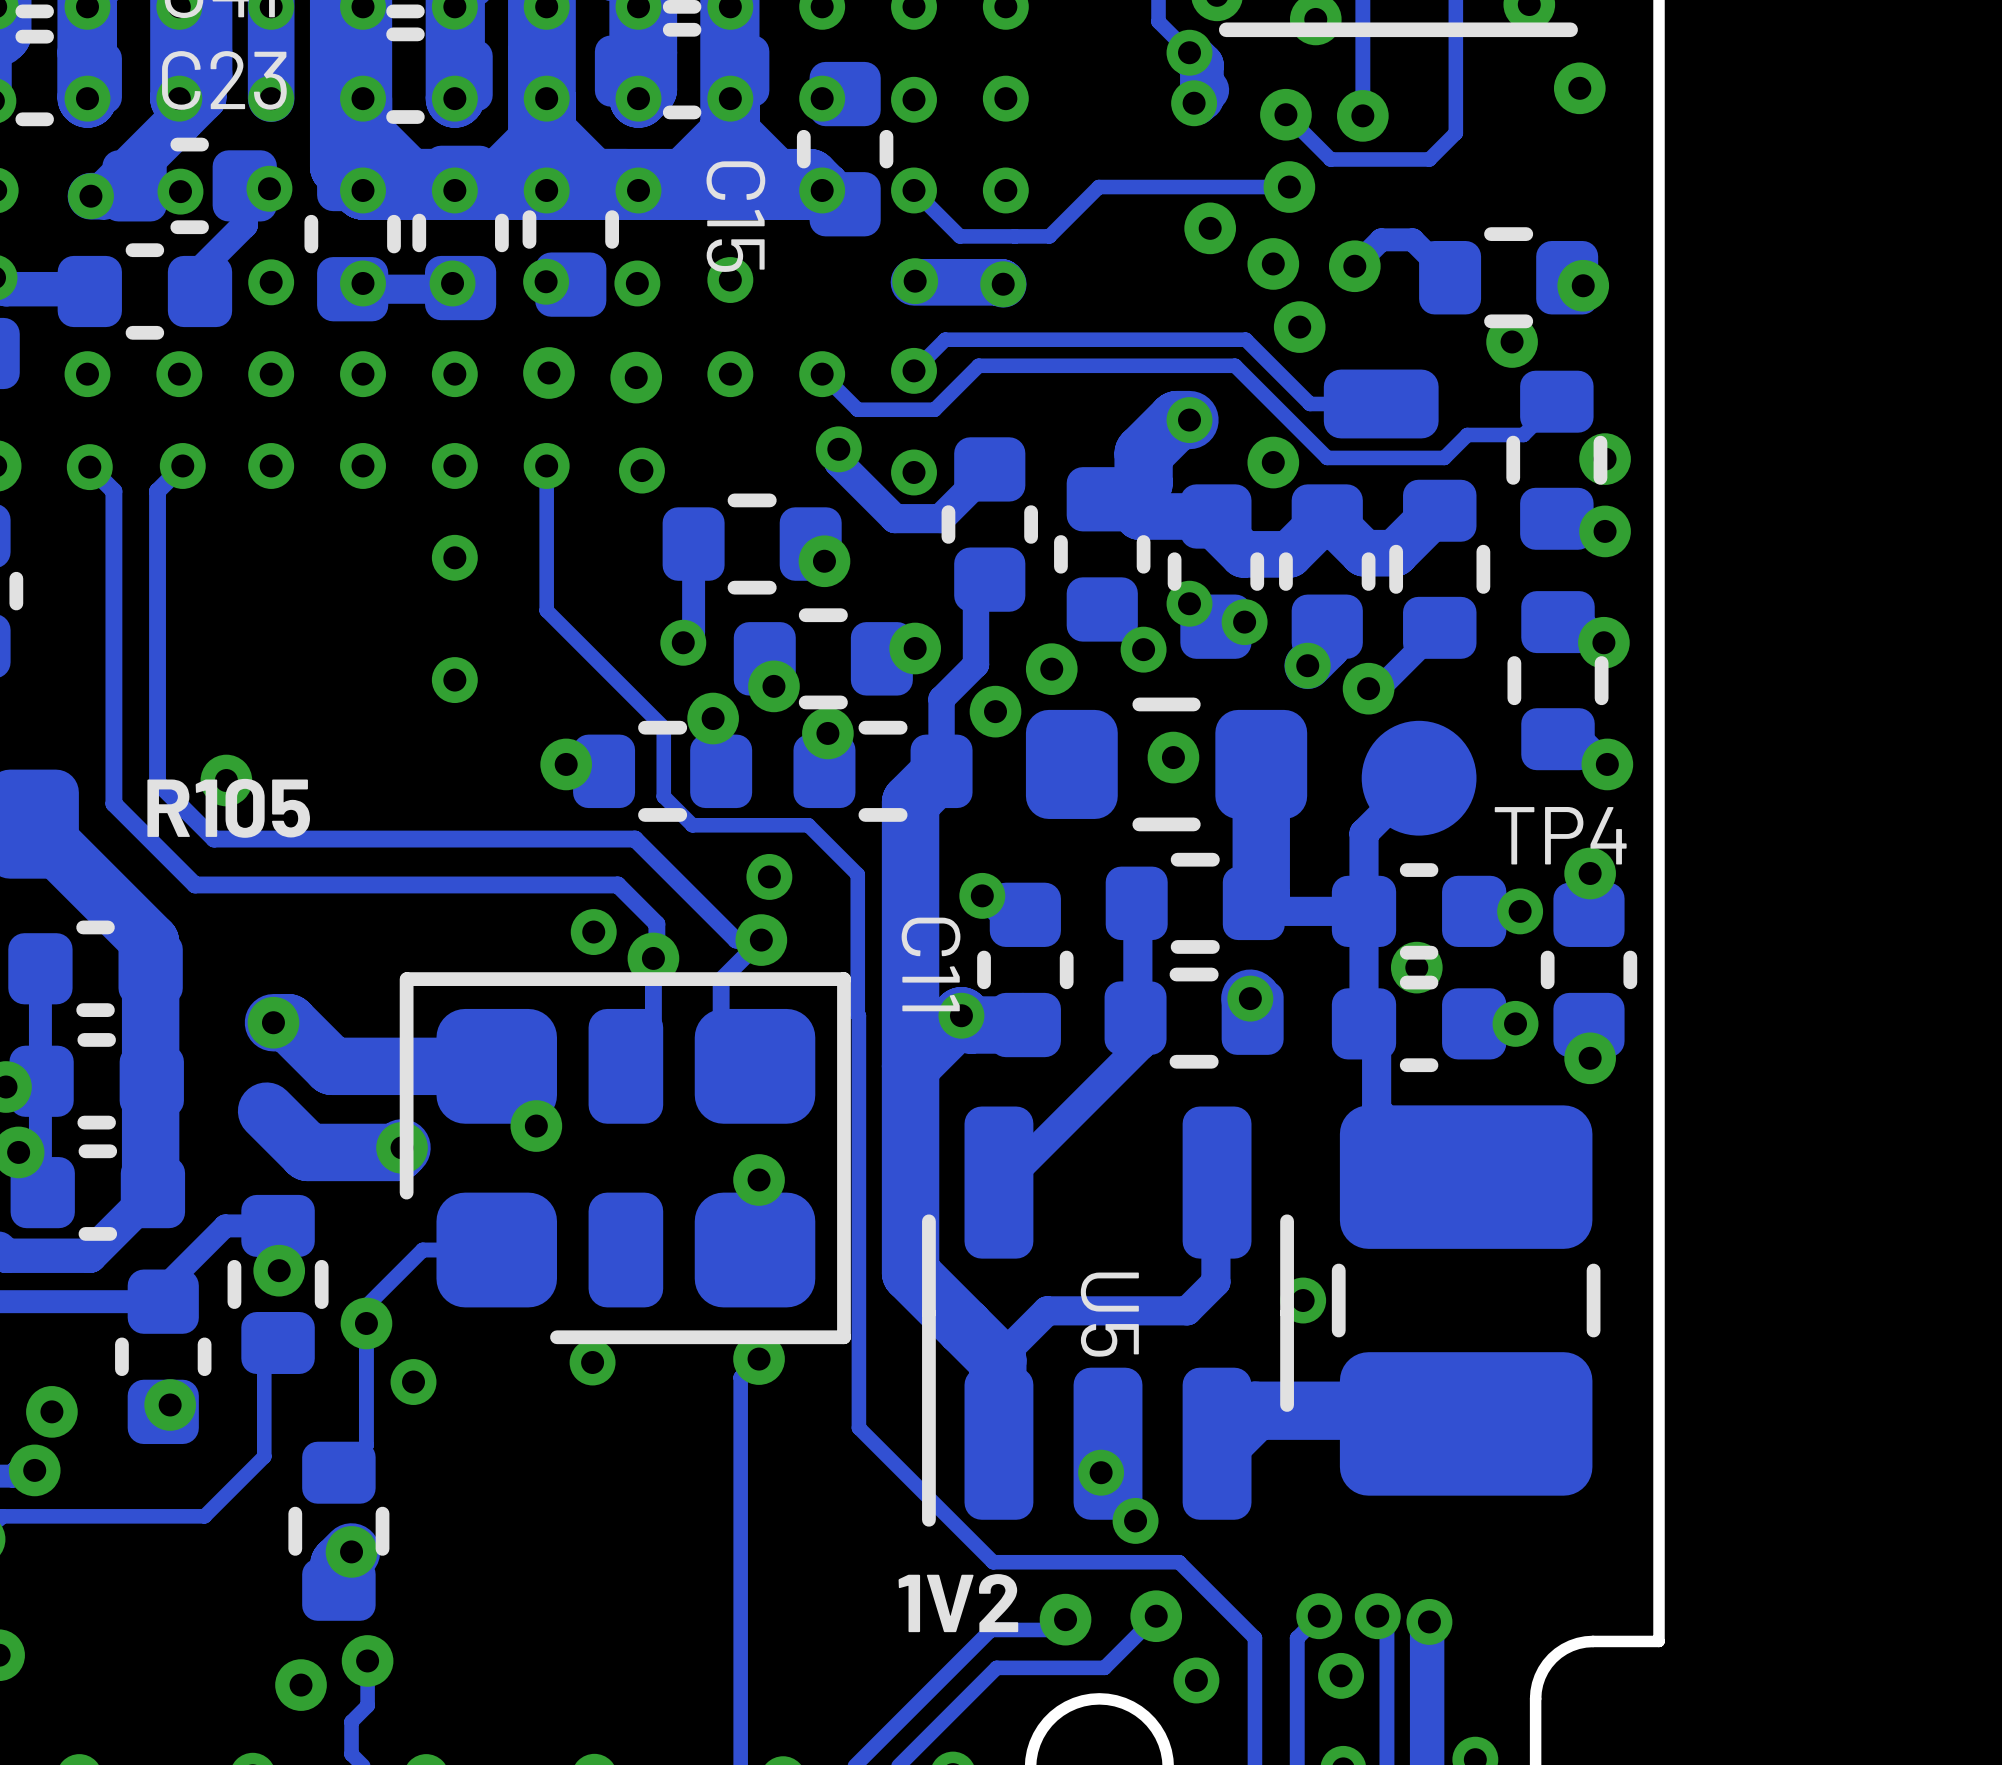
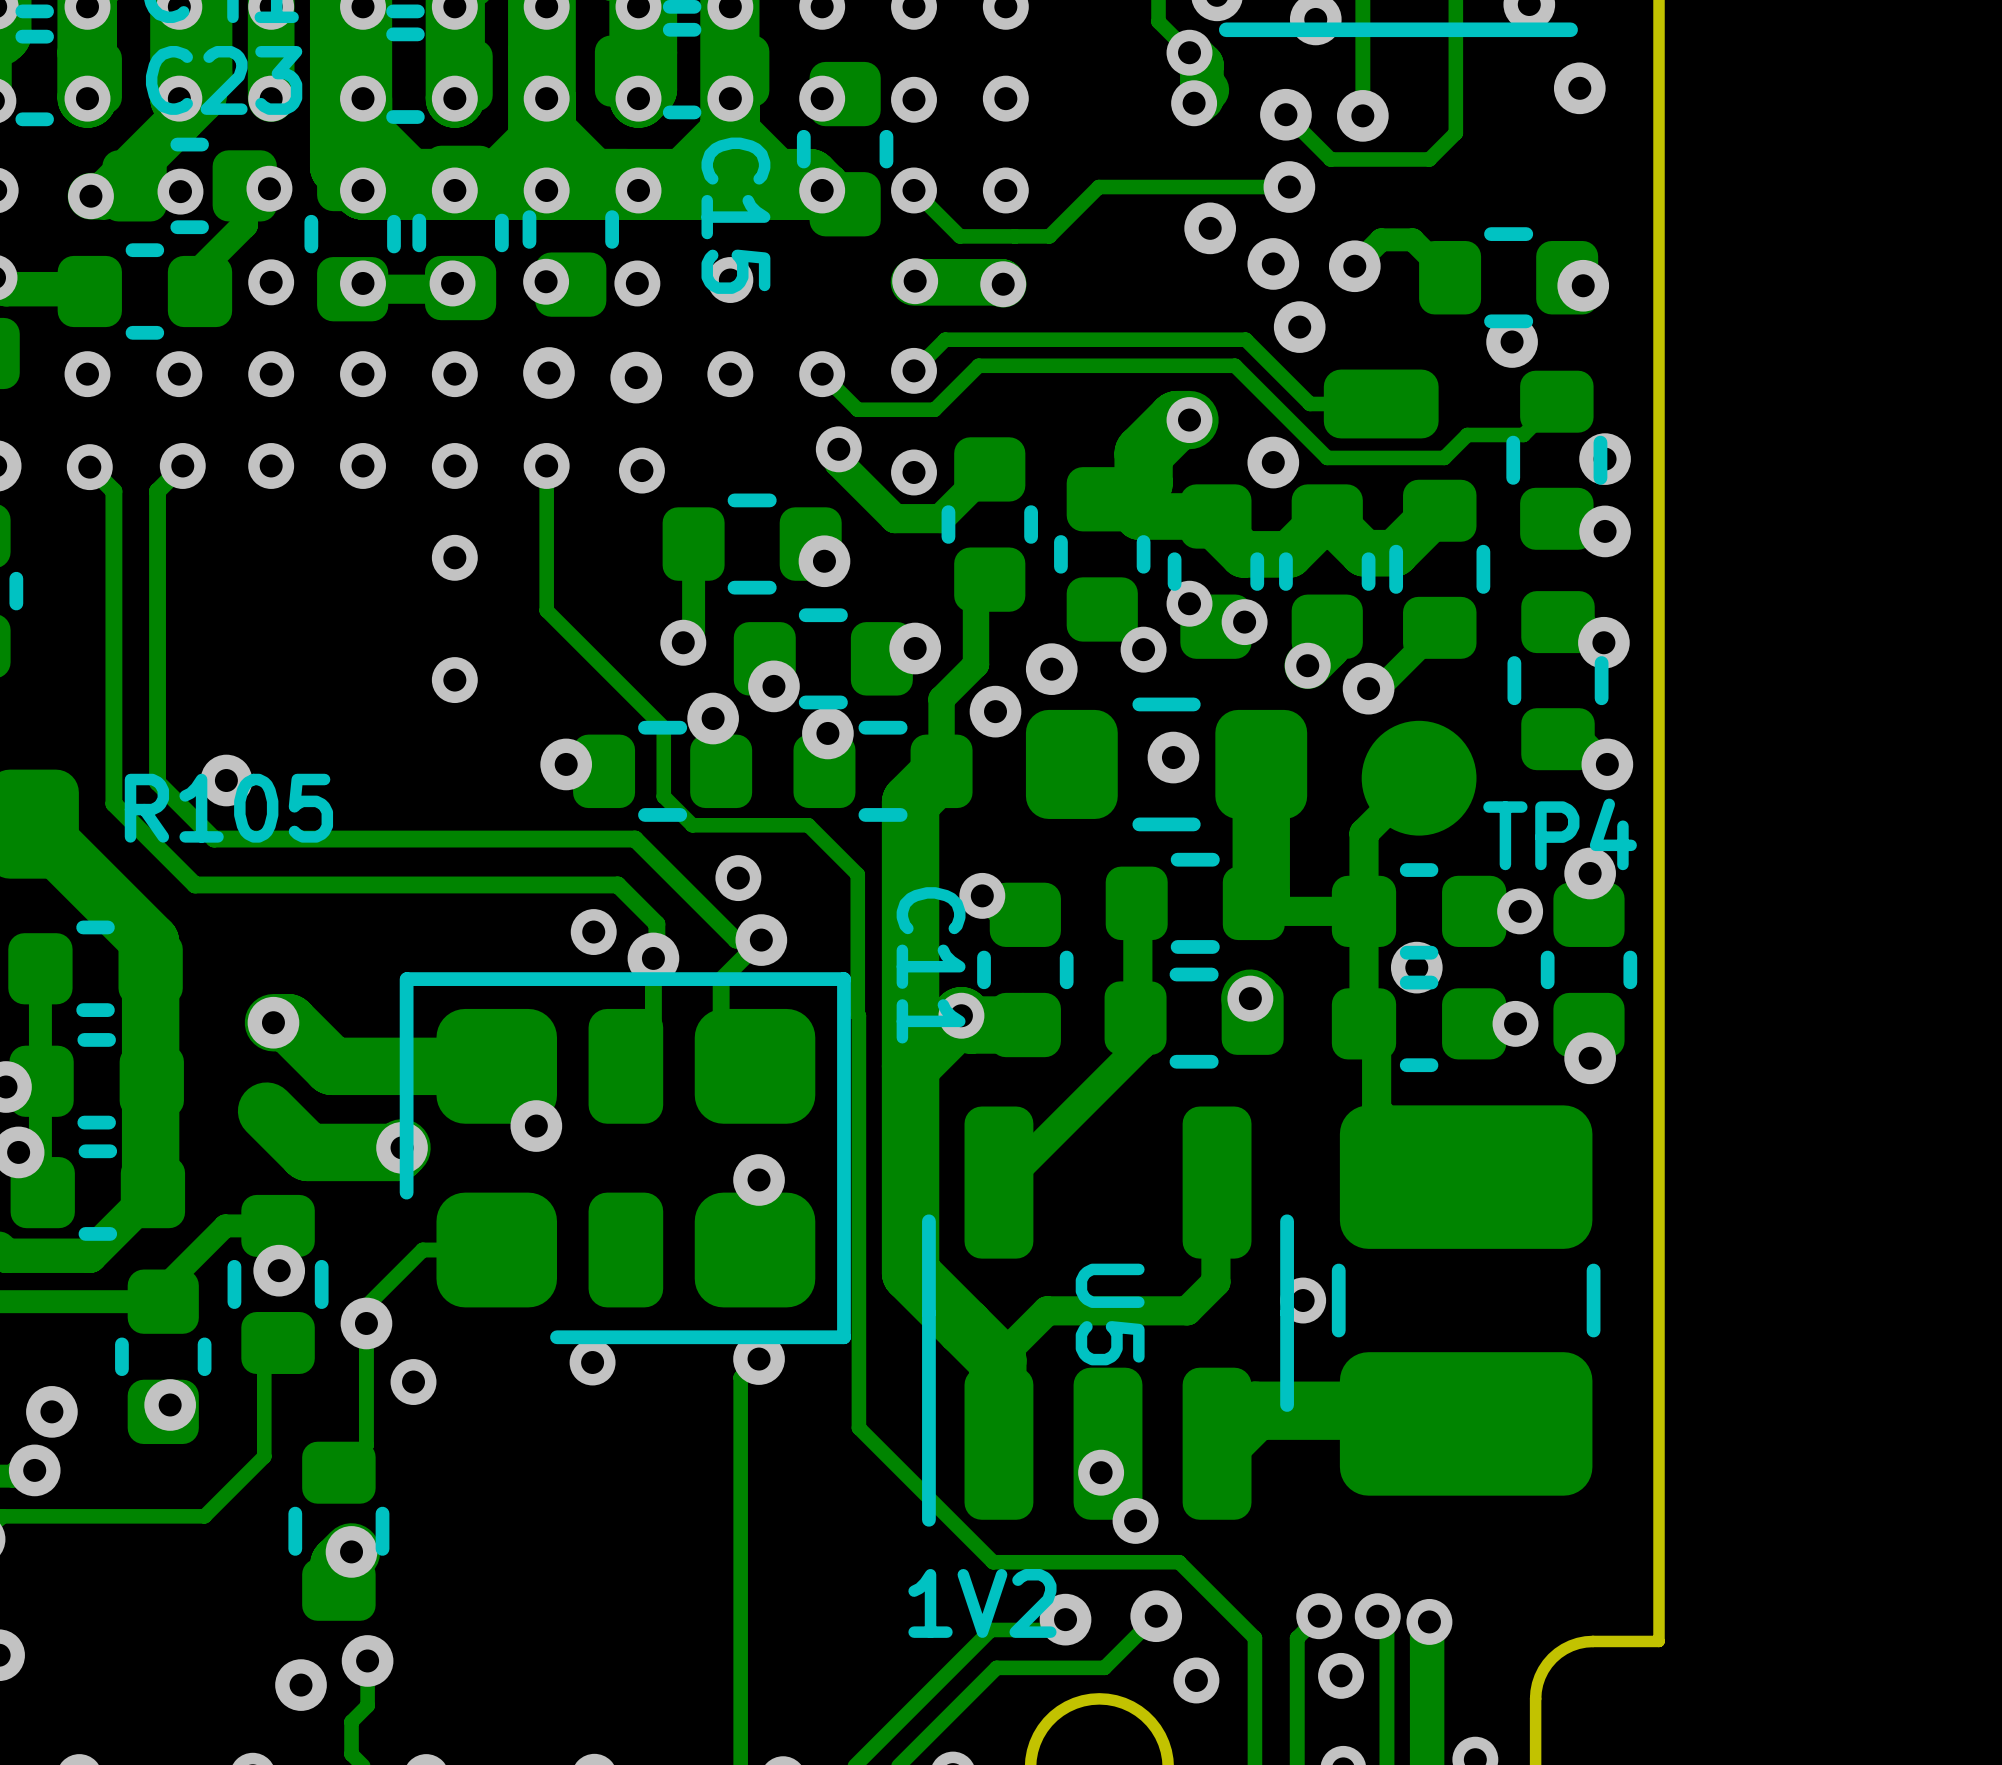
via position: (769, 876) -> (738, 878)

